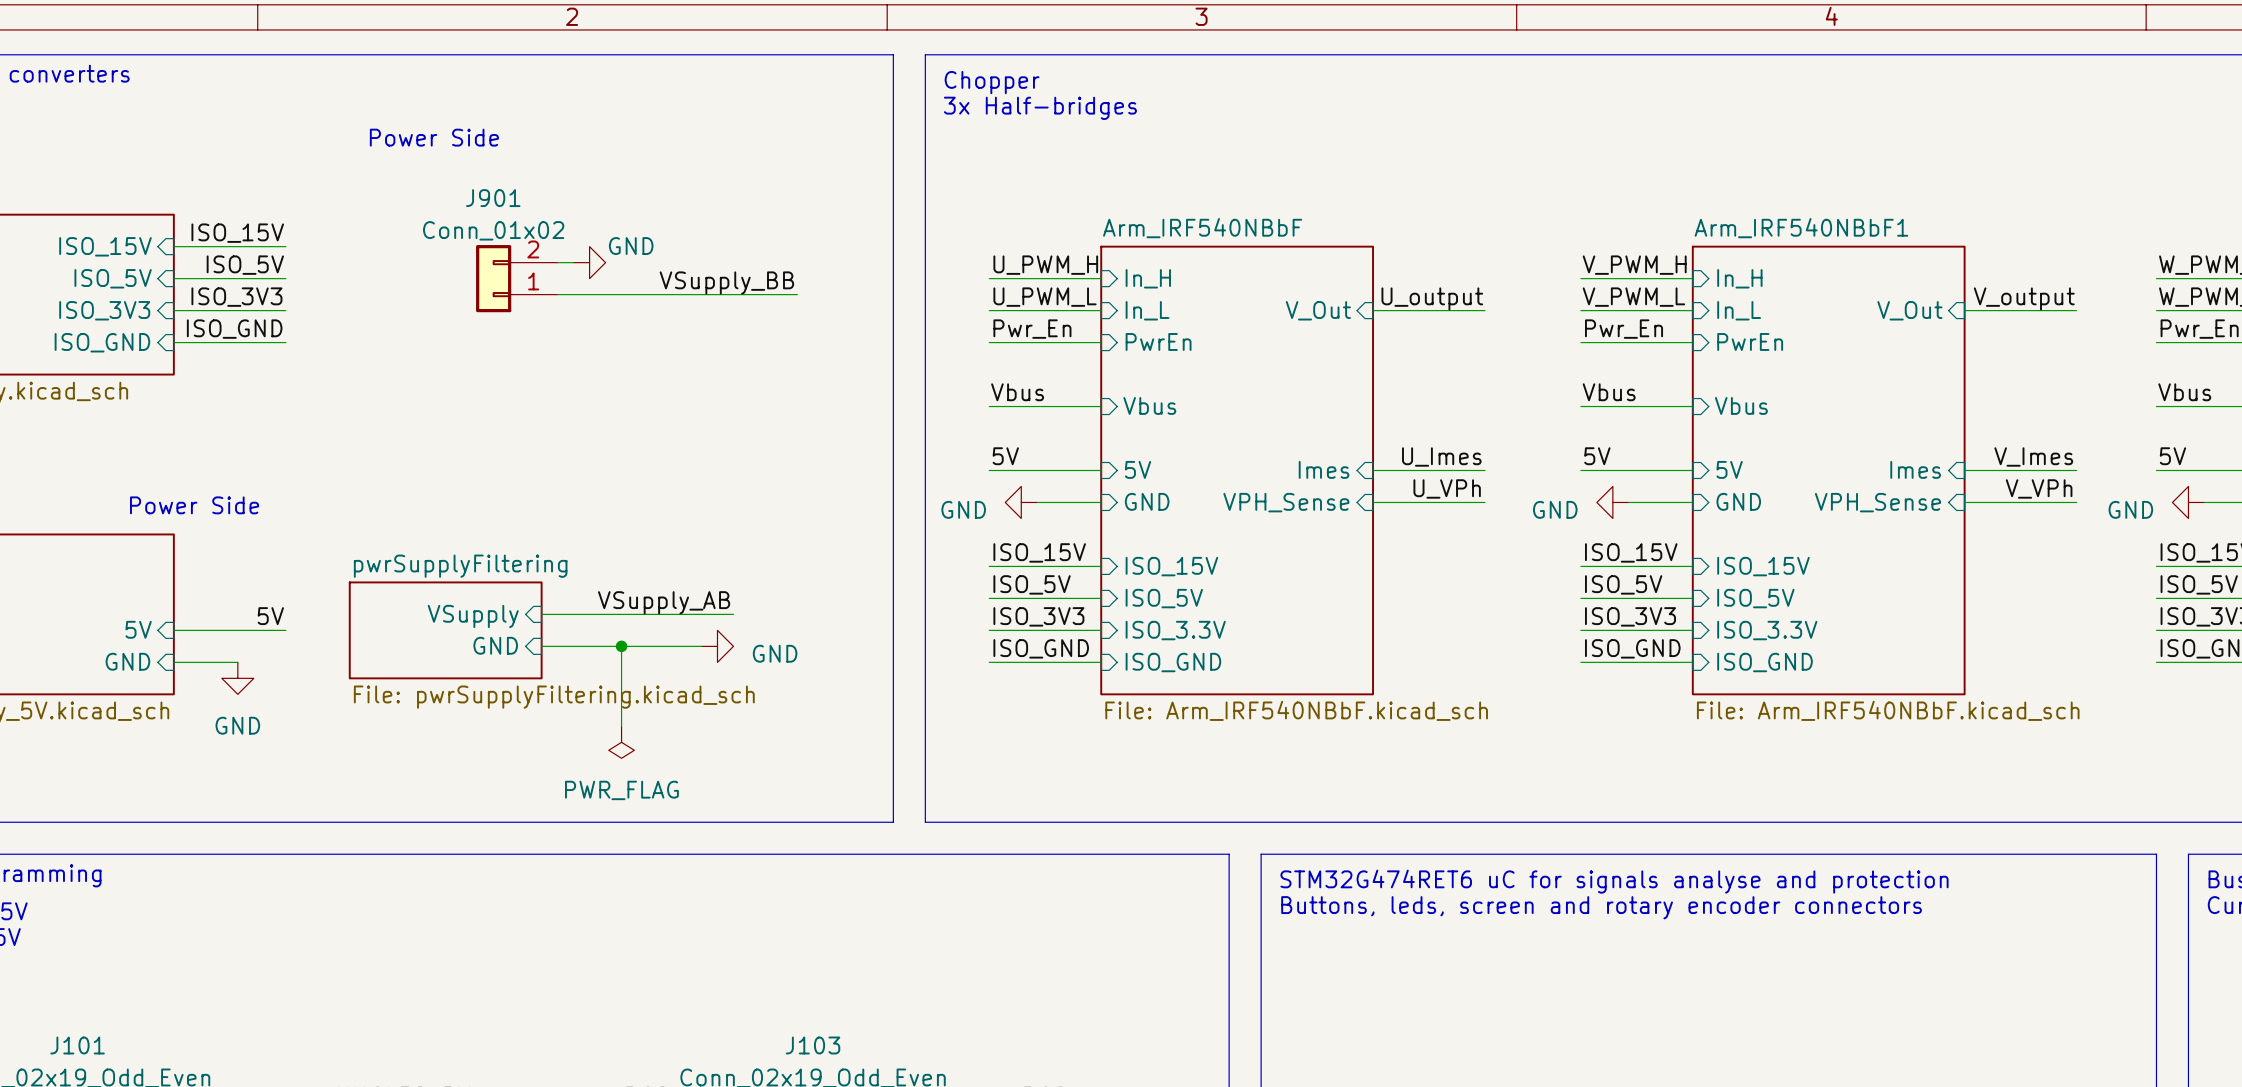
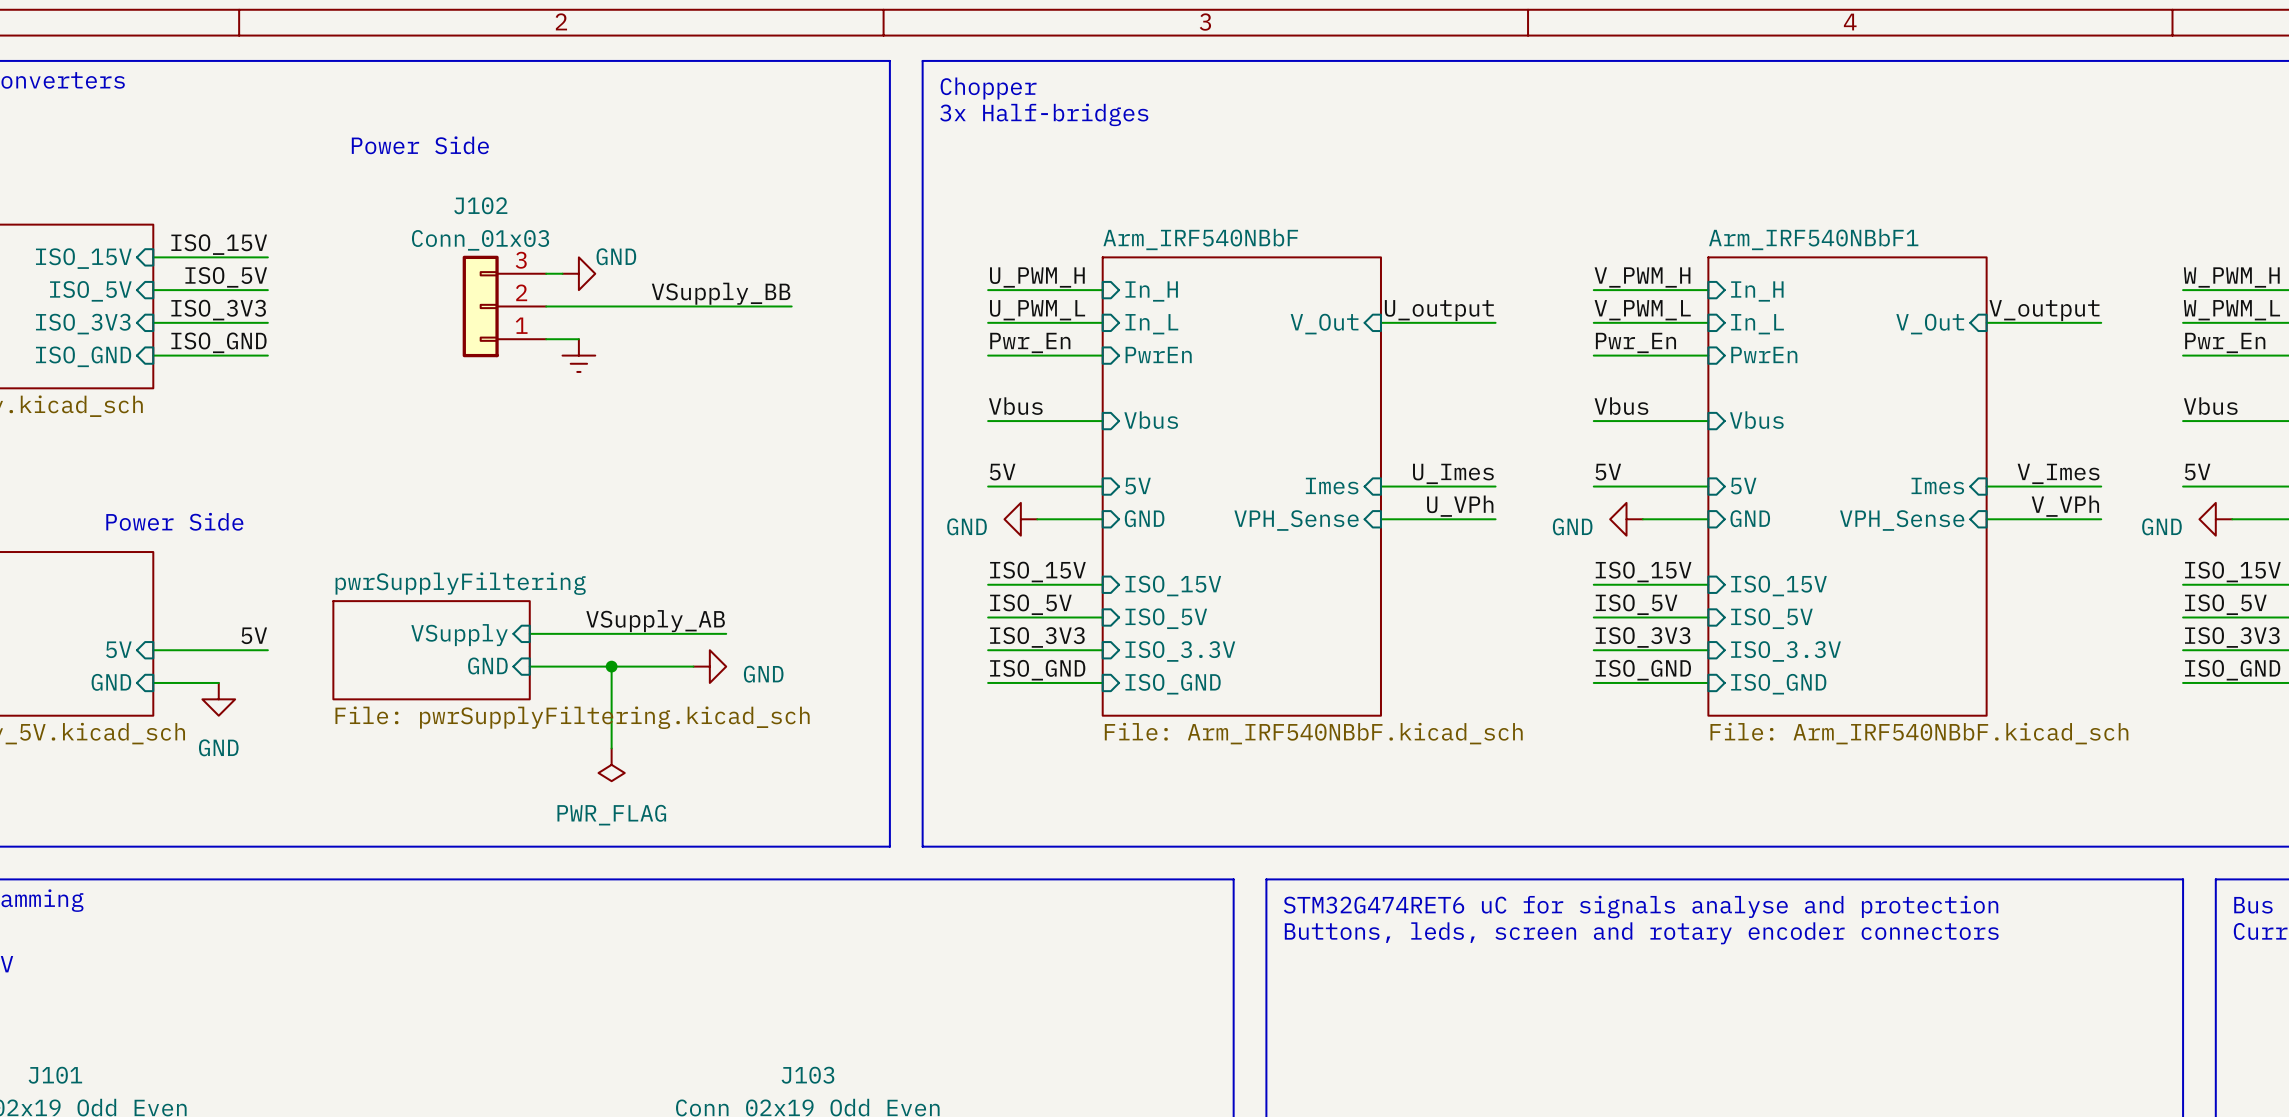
J901: Conn_01x02 (516, 278) -> none
J102: none -> Conn_01x03 (504, 306)
wire: none -> (546, 339) (578, 339)
power symbol: none -> (578, 355)

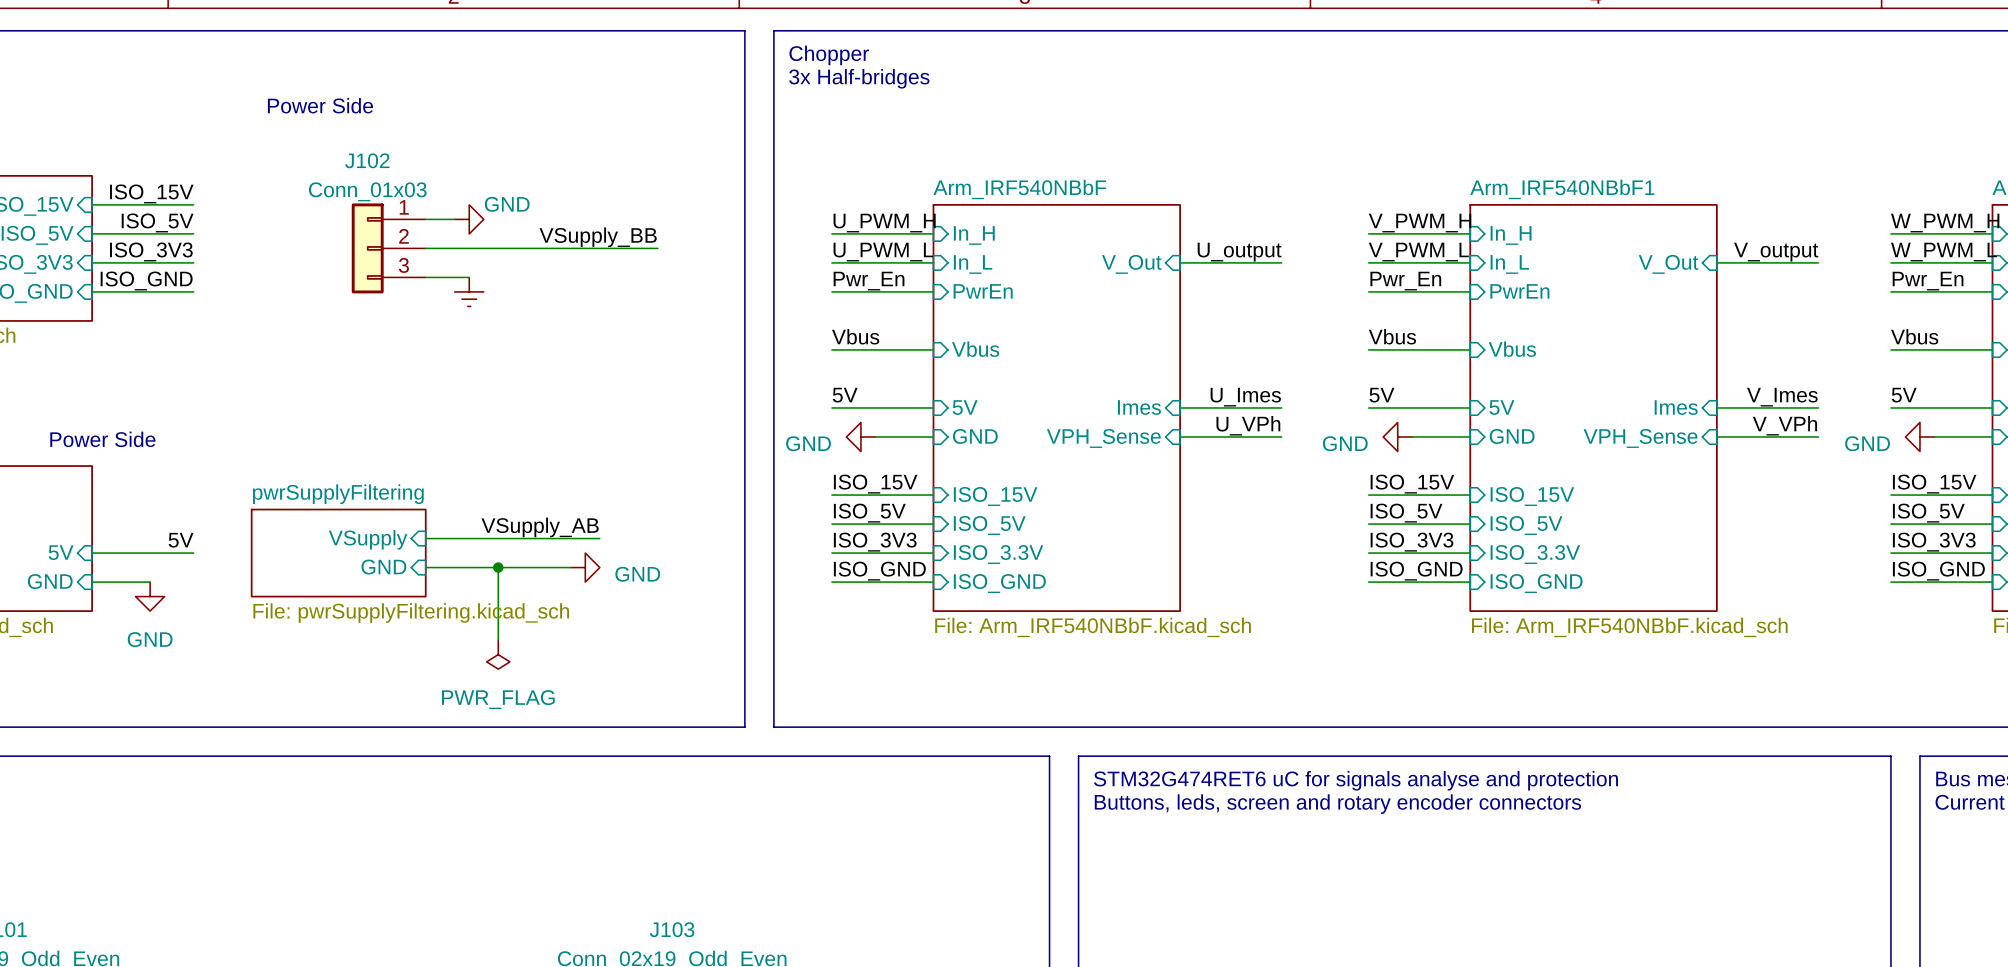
J102 flip: as is (480, 306) -> up-down (367, 248)

